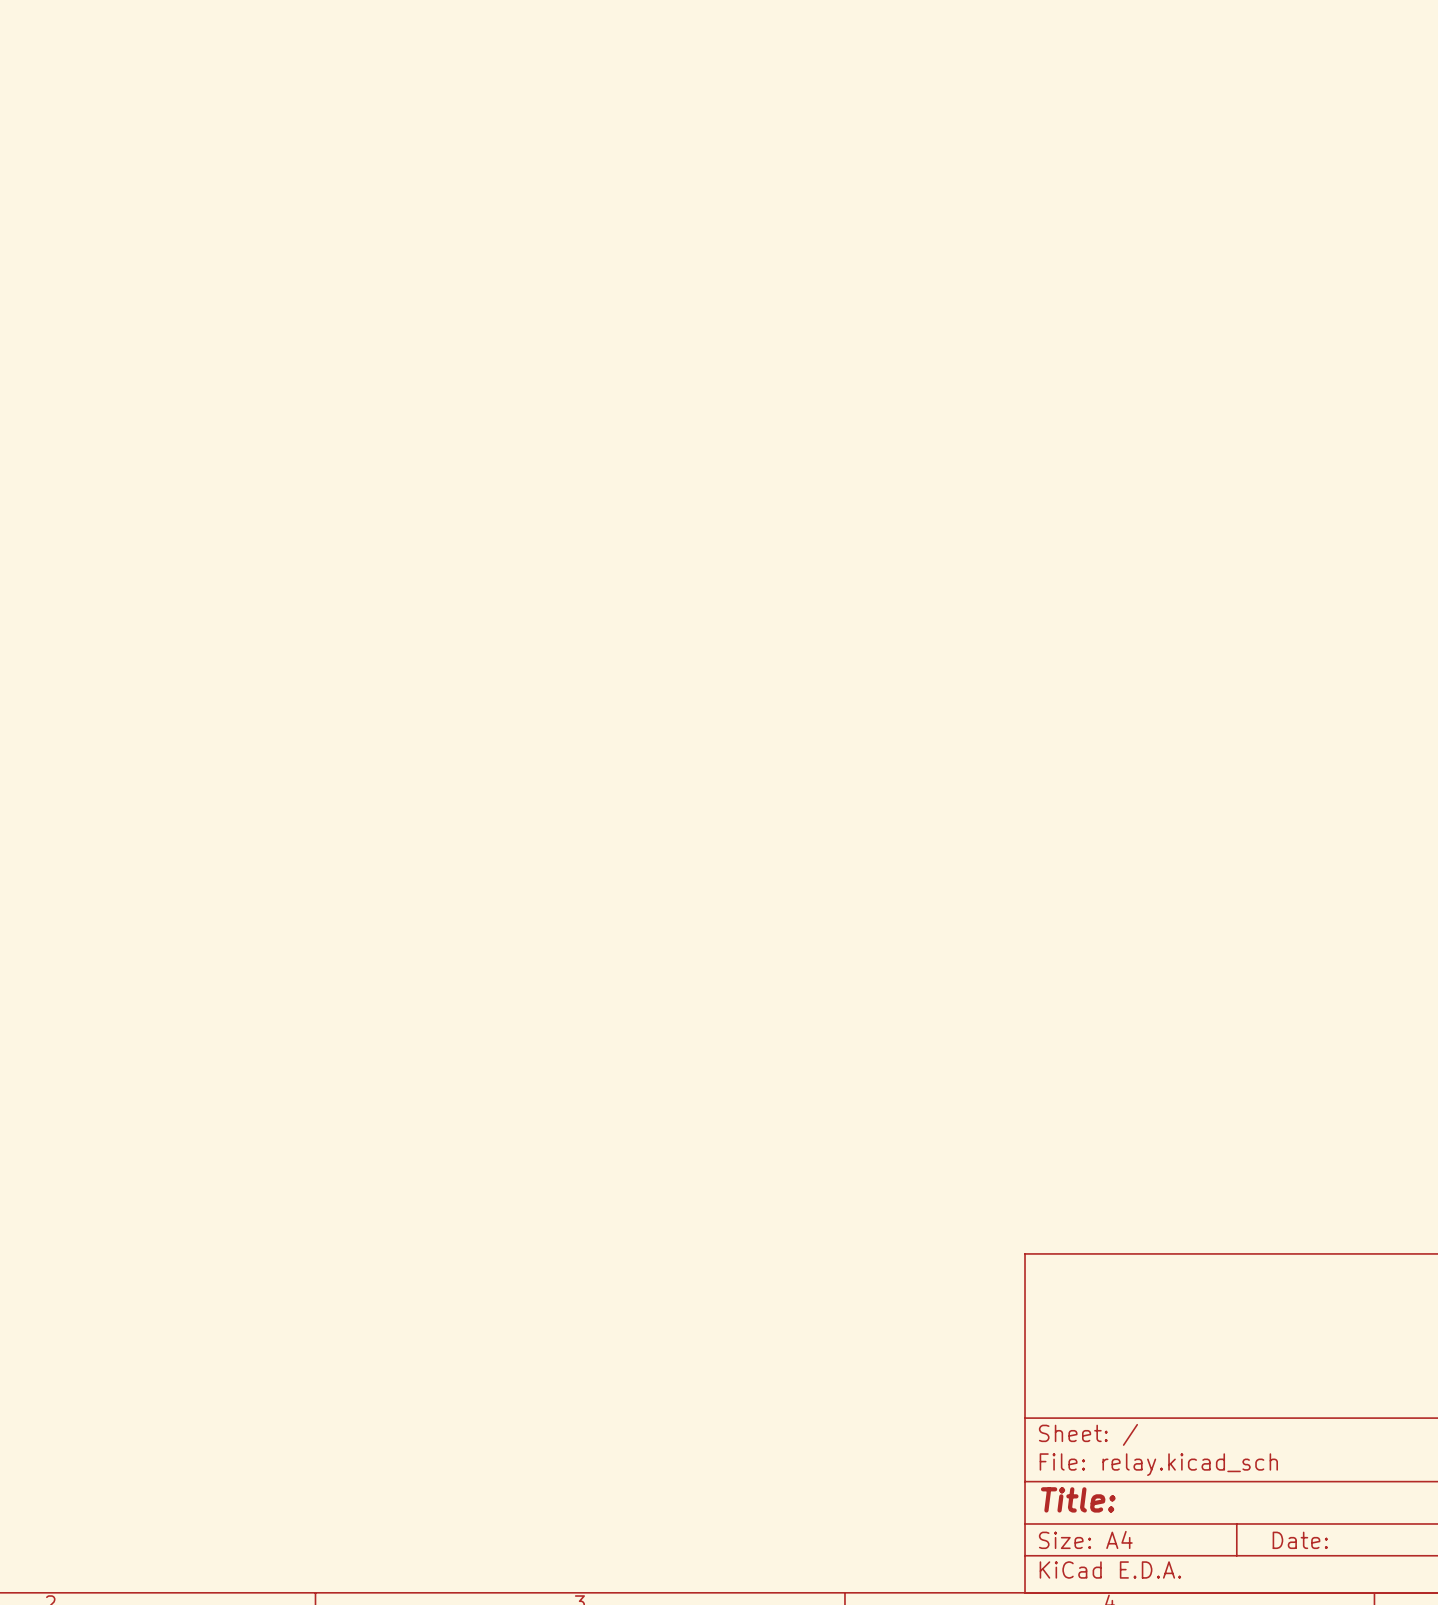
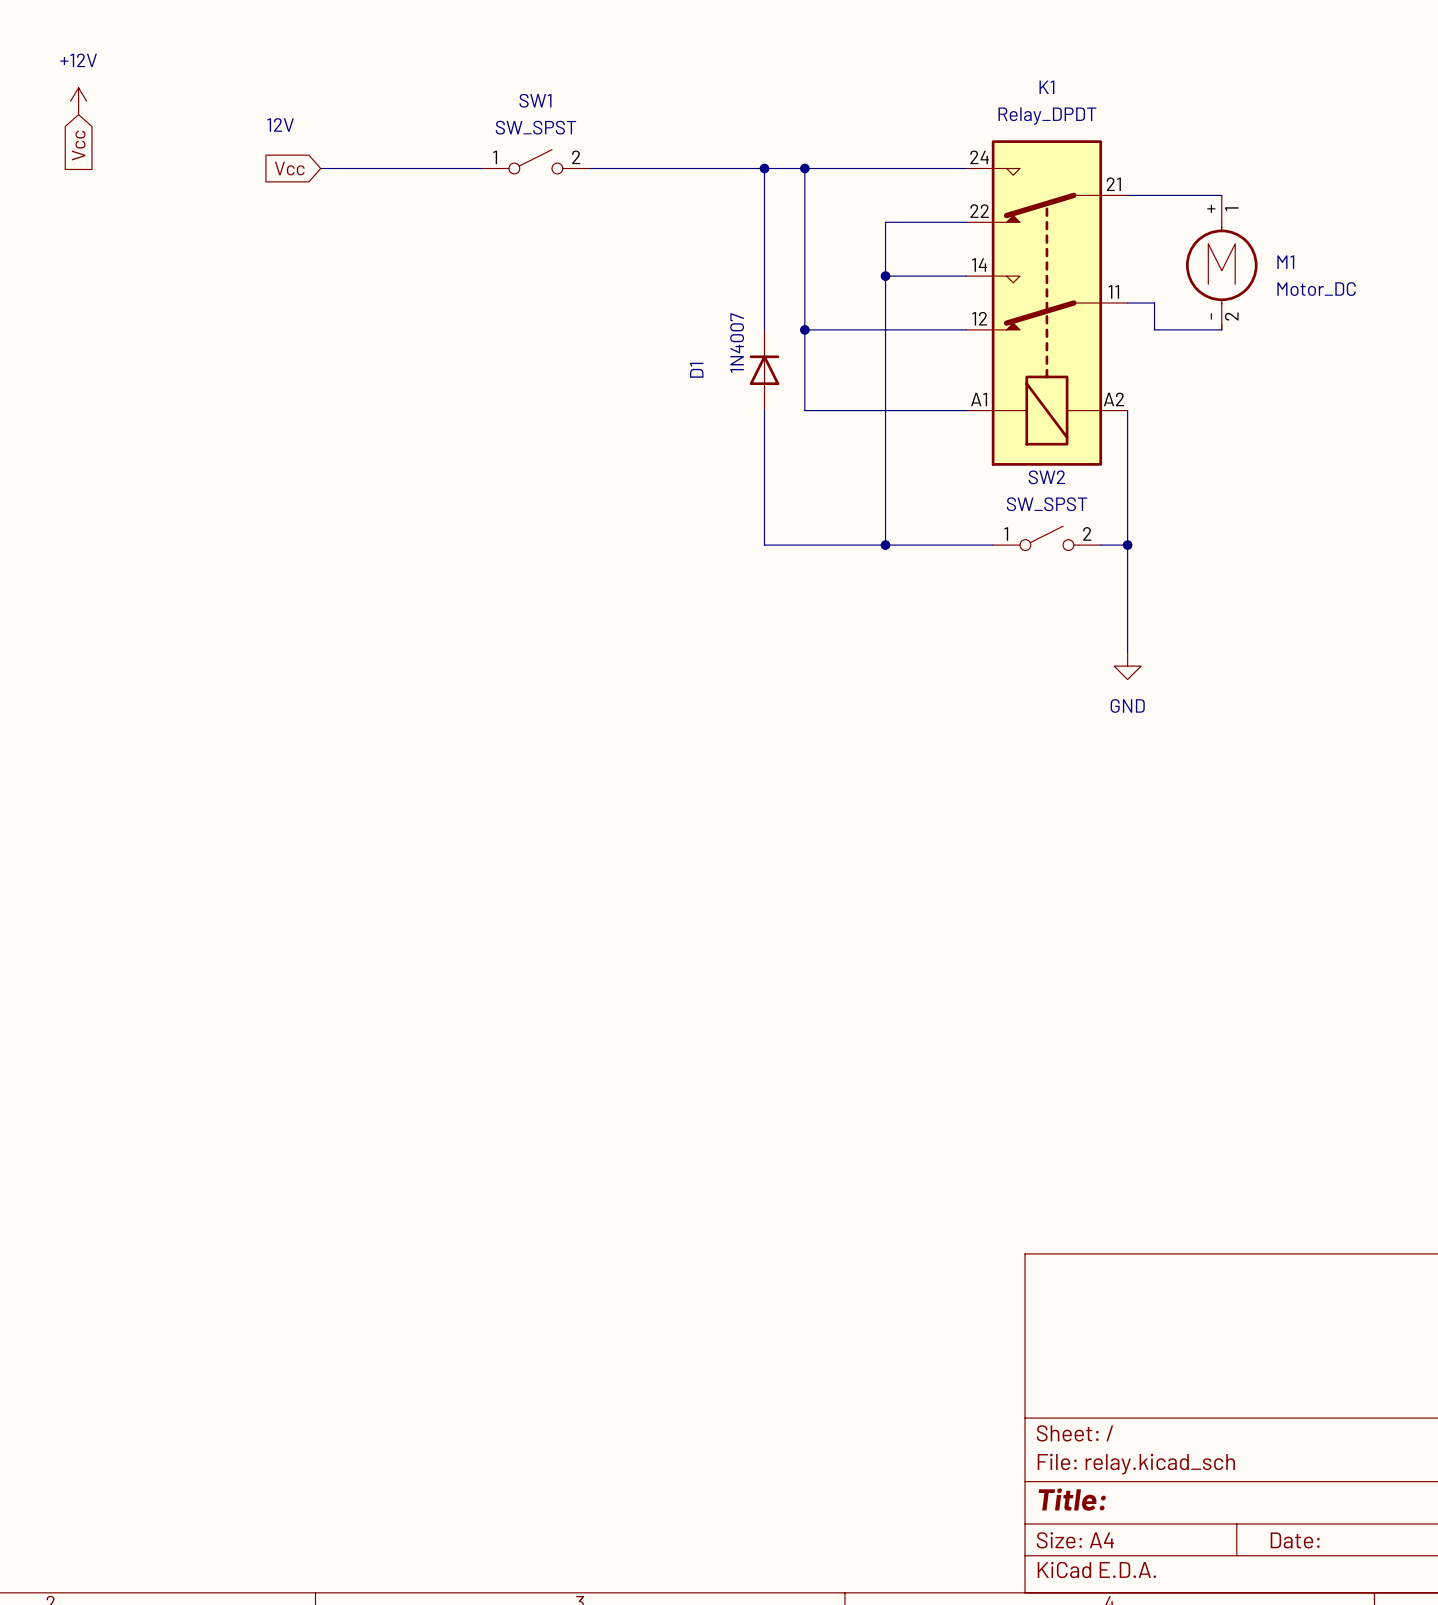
power symbol: none -> +12V (78, 101)
text: none -> 12V (280, 124)
global label: none -> Vcc (78, 145)
SW1: none -> SW_SPST (535, 161)
global label: none -> Vcc (289, 168)
wire: none -> (320, 168) (482, 168)
wire: none -> (589, 168) (966, 168)
wire: none -> (764, 168) (764, 329)
junction: none -> (764, 168)
wire: none -> (804, 168) (804, 410) (966, 410)
junction: none -> (804, 168)
wire: none -> (1127, 195) (1221, 195)
wire: none -> (966, 222) (885, 222) (885, 545)
M1: none -> Motor_DC (1221, 262)
wire: none -> (885, 276) (966, 276)
junction: none -> (885, 276)
K1: none -> Relay_DPDT (1046, 303)
wire: none -> (1127, 303) (1154, 303) (1154, 329) (1221, 329)
wire: none -> (804, 329) (966, 329)
junction: none -> (804, 329)
D1: none -> 1N4007 (764, 370)
wire: none -> (764, 410) (764, 545) (993, 545)
wire: none -> (1127, 410) (1127, 652)
SW2: none -> SW_SPST (1046, 538)
junction: none -> (885, 545)
wire: none -> (1100, 545) (1127, 545)
junction: none -> (1127, 545)
power symbol: none -> GND (1127, 666)

